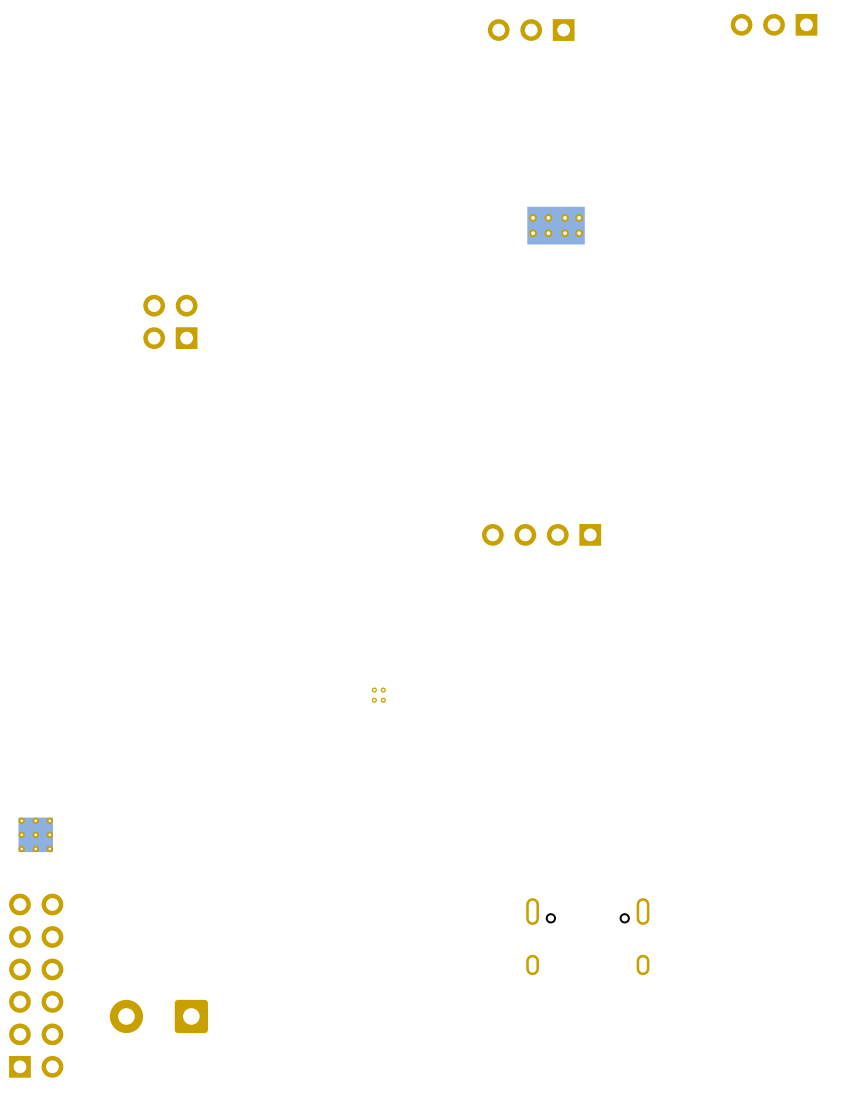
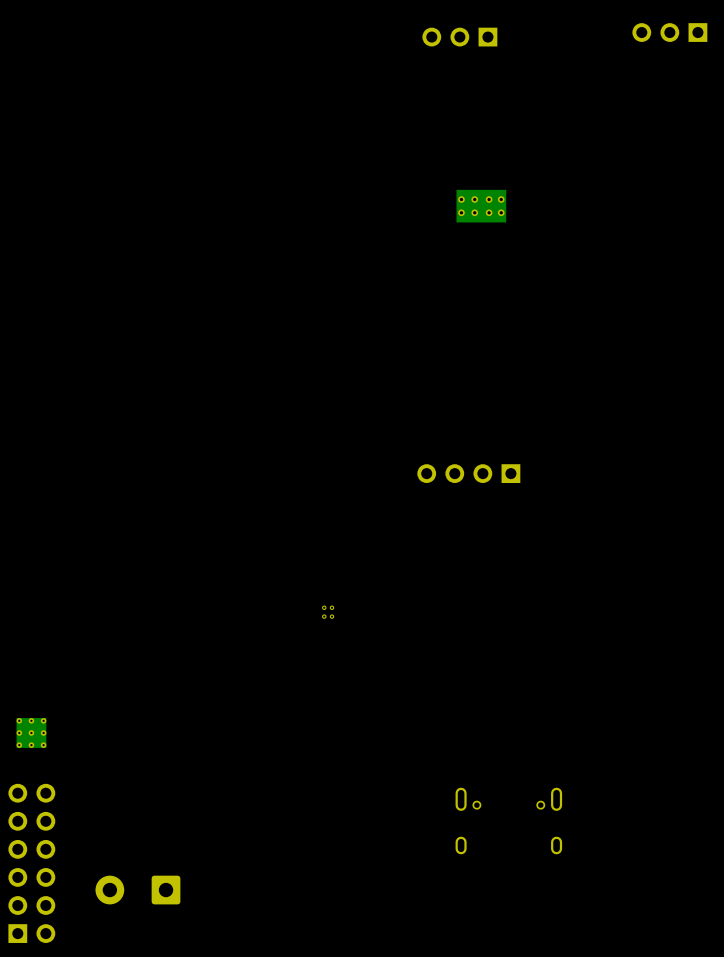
part: (170, 321) -> none

